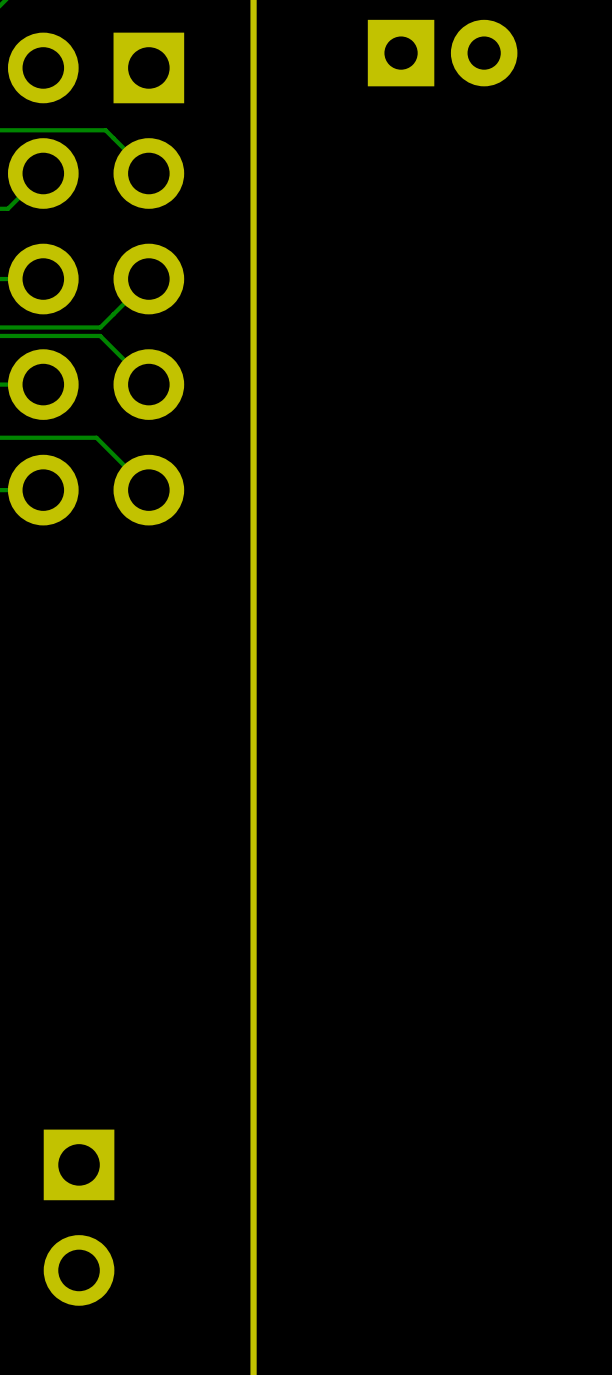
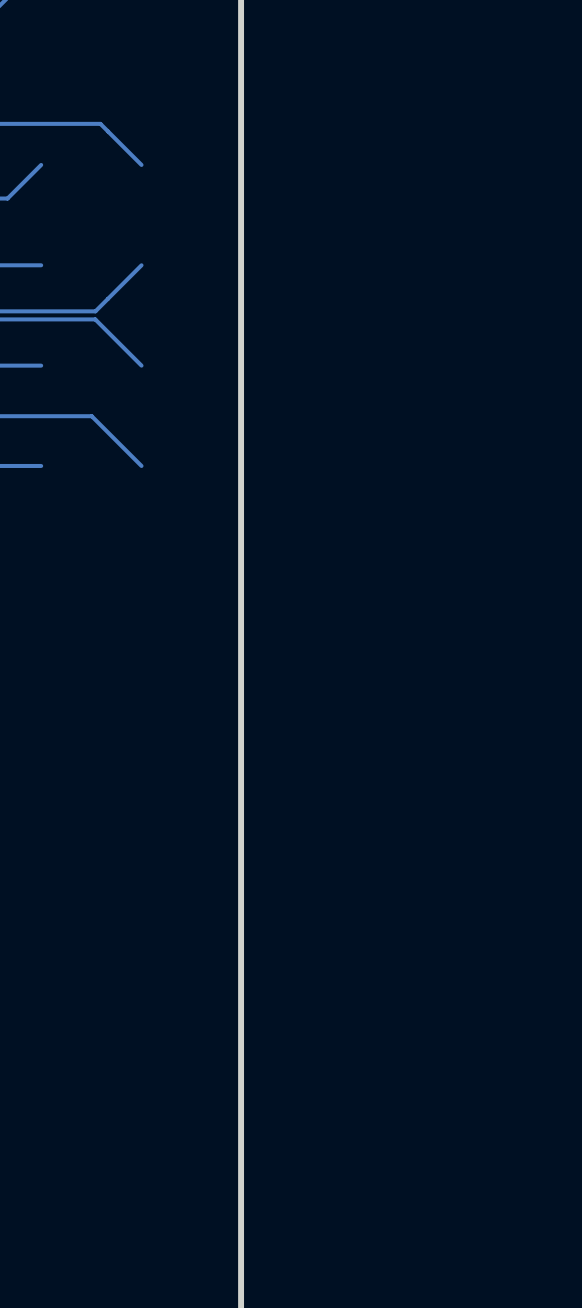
part: (442, 53) -> none
part: (96, 279) -> none
part: (79, 1217) -> none

